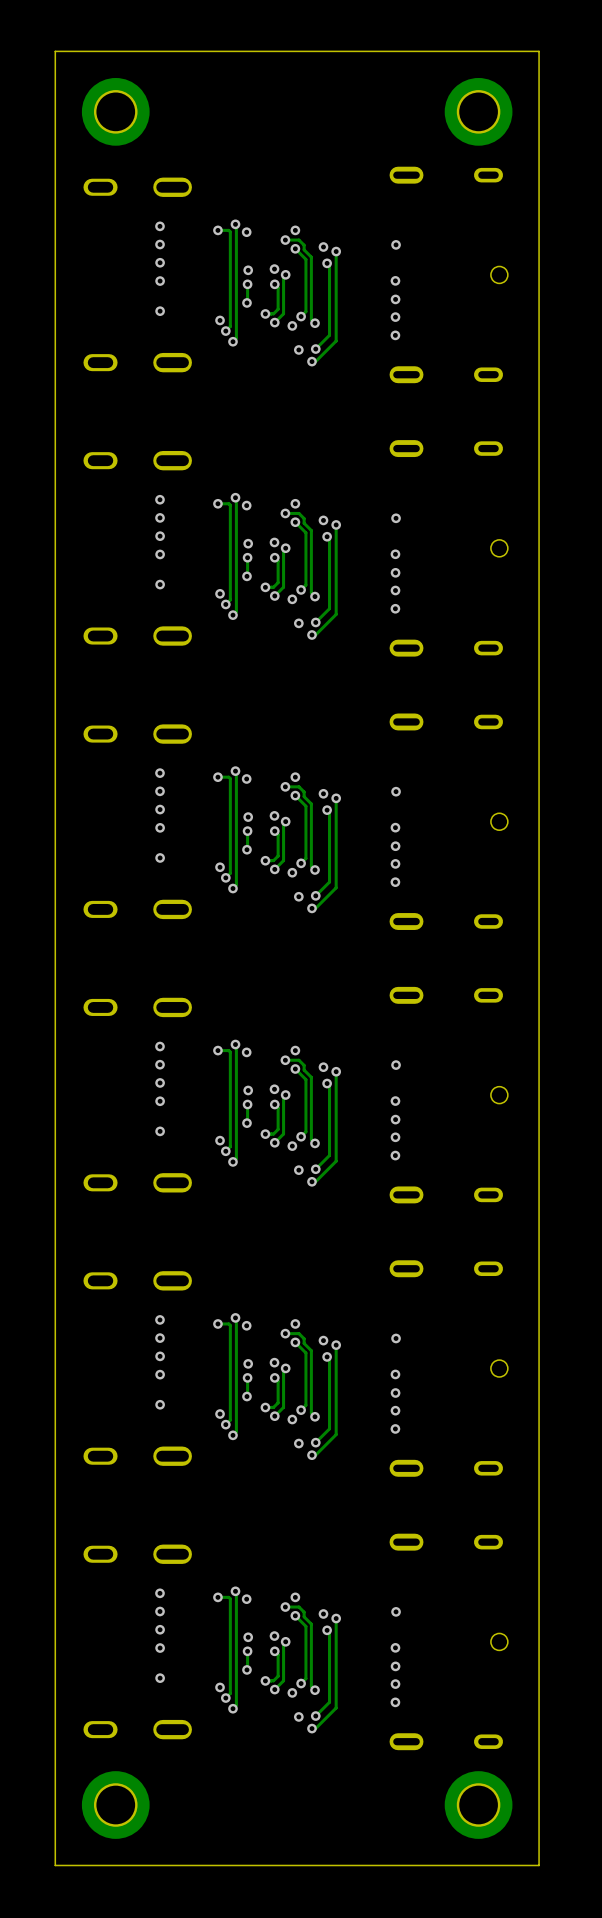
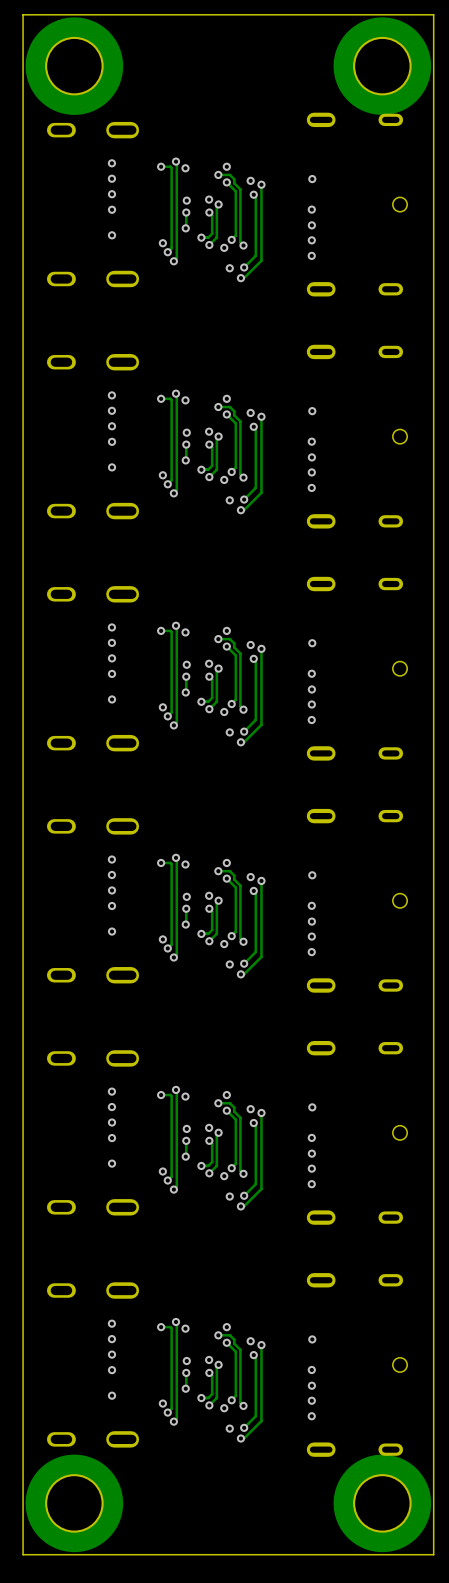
part footprint: [81, 77, 150, 146] -> [25, 17, 124, 115]
part footprint: [444, 77, 513, 146] -> [333, 17, 432, 115]
part footprint: [81, 1771, 150, 1839] -> [25, 1454, 124, 1553]
part footprint: [444, 1771, 513, 1839] -> [333, 1454, 432, 1553]

